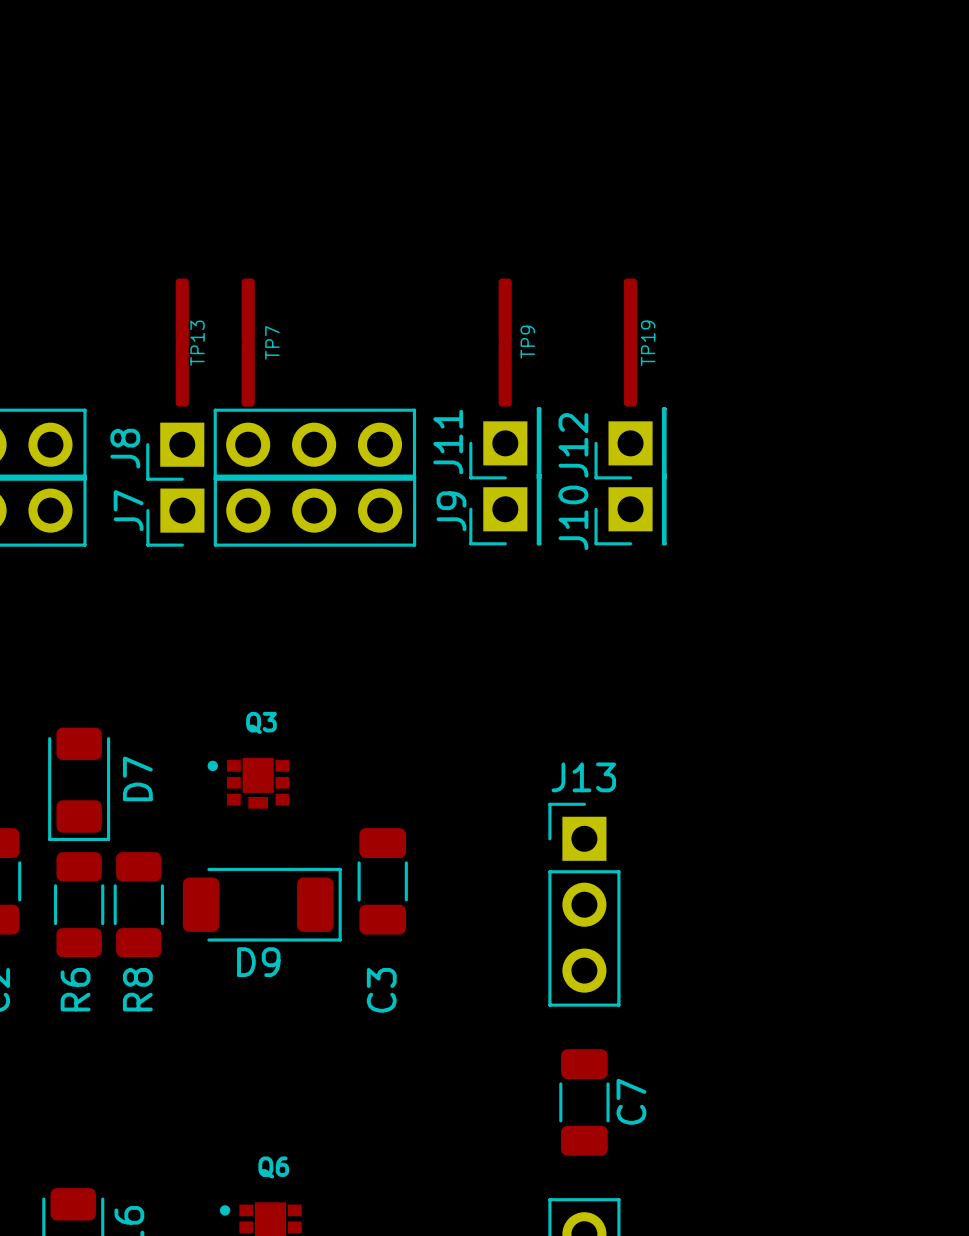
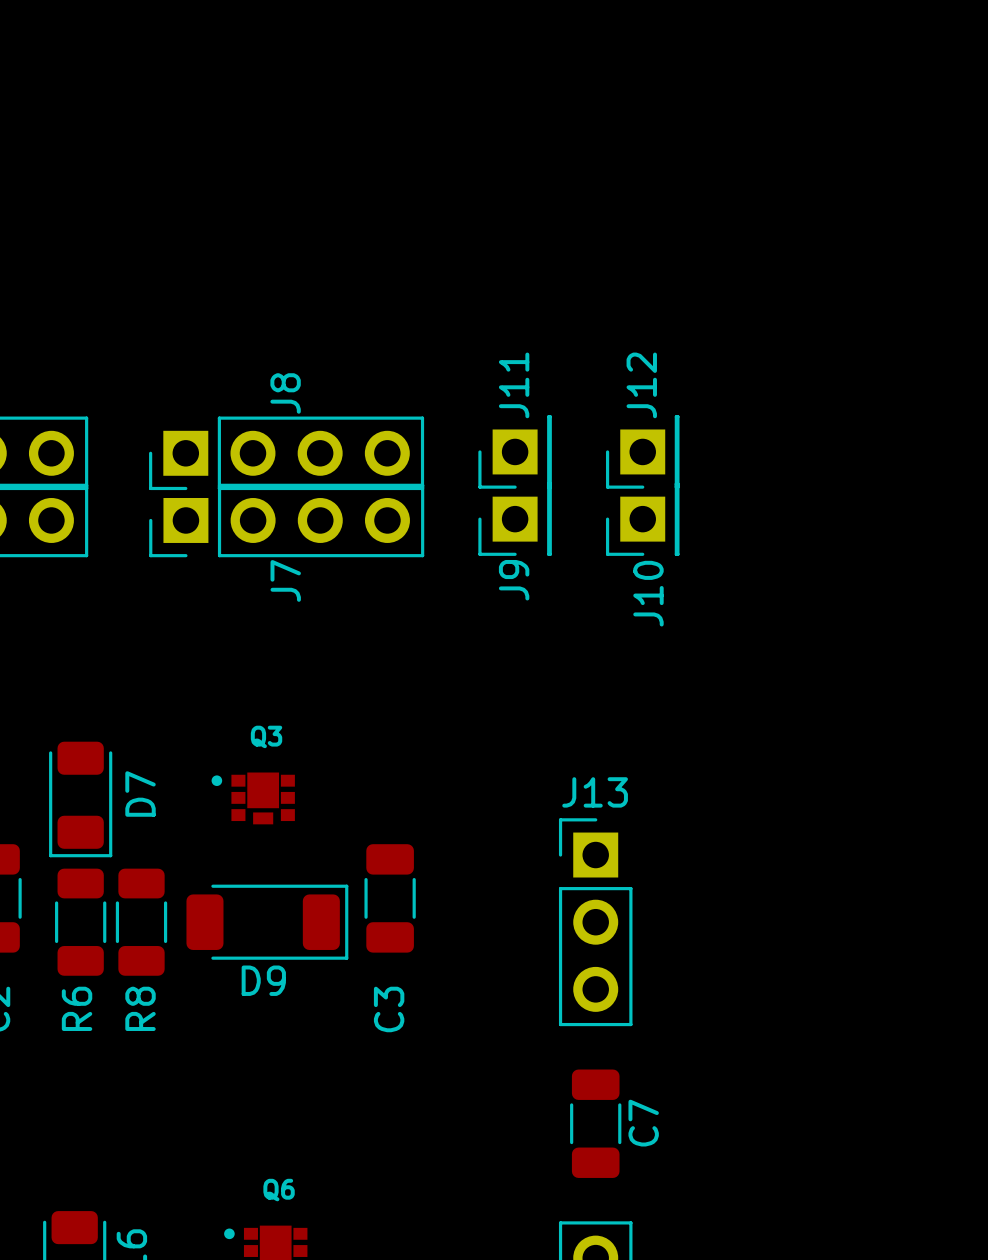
TP13: (182, 342) -> none
TP7: (248, 342) -> none
TP9: (505, 342) -> none
TP19: (630, 342) -> none
J11 name position: J11 (448, 442) -> J11 (514, 385)
J12 name position: J12 (573, 445) -> J12 (641, 385)
J8 name position: J8 (125, 448) -> J8 (285, 393)
J7 name position: J7 (128, 510) -> J7 (285, 580)
J9 name position: J9 (451, 511) -> J9 (514, 580)
J10 name position: J10 (573, 517) -> J10 (648, 593)

